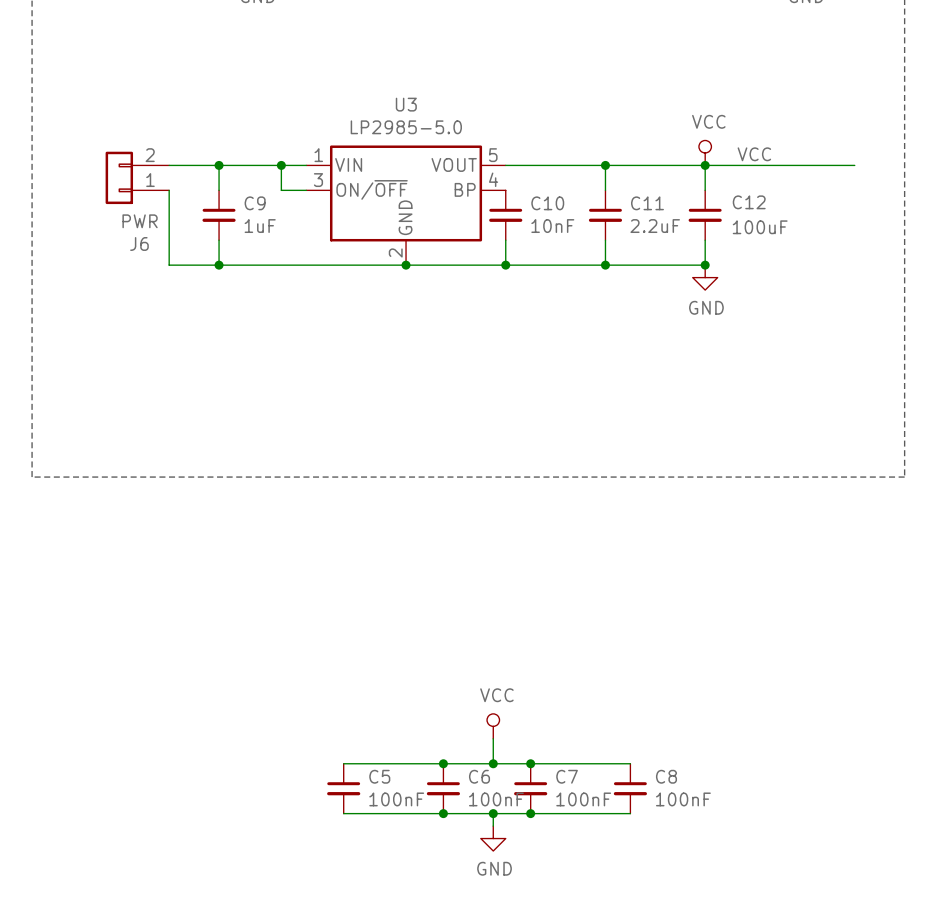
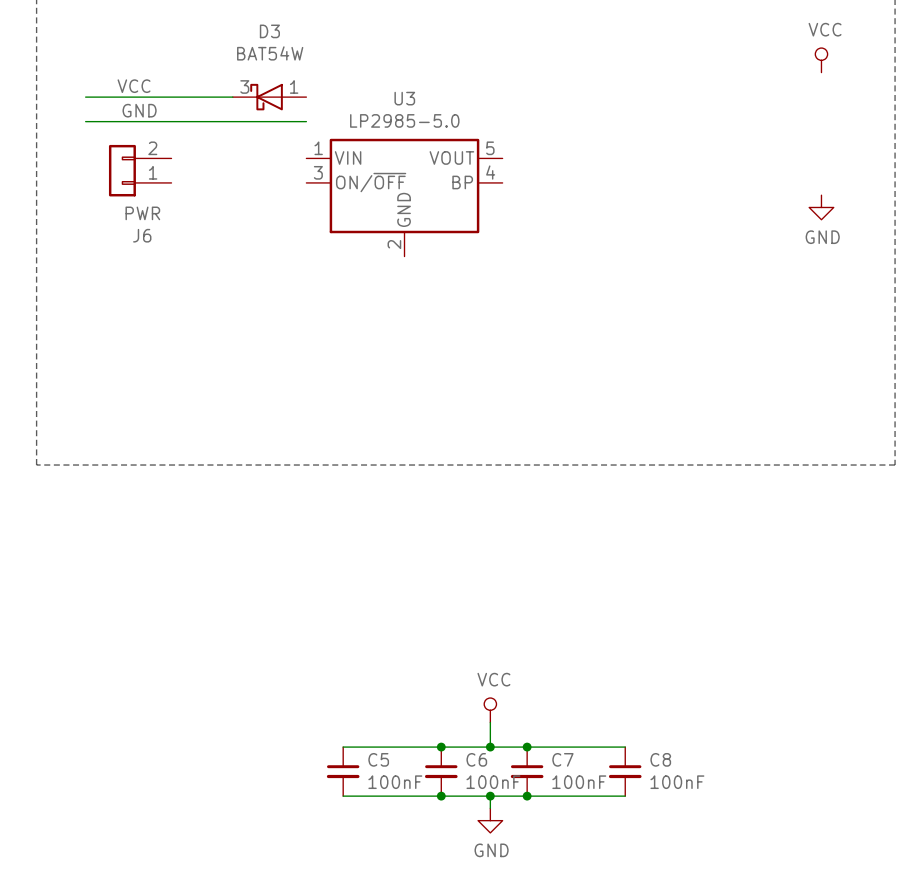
power symbol: none -> VCC (821, 60)
label: none -> VCC (134, 86)
wire: none -> (85, 97) (232, 97)
D3: none -> BAT54W (269, 97)
label: none -> GND (139, 110)
wire: none -> (85, 121) (306, 121)
power symbol: VCC (705, 152) -> none
label: VCC (754, 154) -> none
wire: (169, 165) (306, 165) -> none
wire: (219, 165) (219, 190) -> none
junction: (219, 165) -> none
wire: (281, 165) (281, 190) (306, 190) -> none
junction: (281, 165) -> none
wire: (505, 165) (854, 165) -> none
wire: (605, 165) (605, 190) -> none
junction: (605, 165) -> none
wire: (705, 165) (705, 190) -> none
junction: (705, 165) -> none
wire: (169, 190) (169, 265) (705, 265) (705, 240) -> none
C9: 1uF (219, 215) -> none
C10: 10nF (505, 215) -> none
C11: 2.2uF (605, 215) -> none
C12: 100uF (705, 215) -> none
wire: (219, 240) (219, 265) -> none
wire: (505, 240) (505, 265) -> none
wire: (605, 240) (605, 265) -> none
junction: (219, 265) -> none
junction: (406, 265) -> none
junction: (505, 265) -> none
junction: (605, 265) -> none
junction: (705, 265) -> none
power symbol position: GND (705, 277) -> GND (821, 207)

